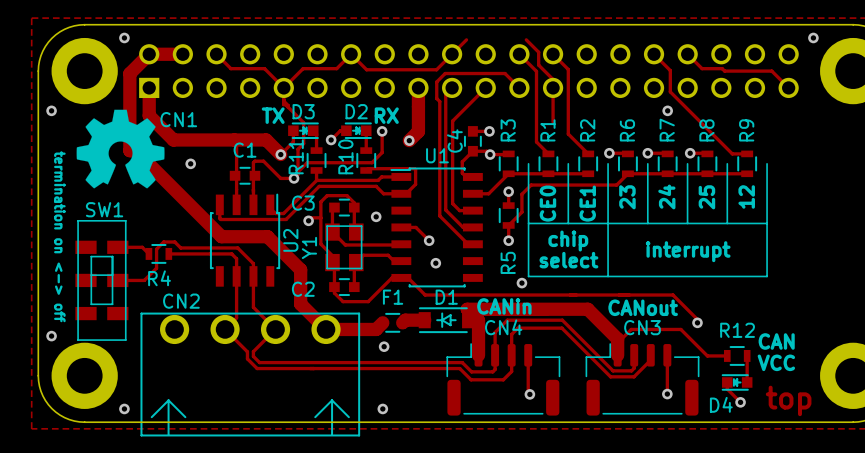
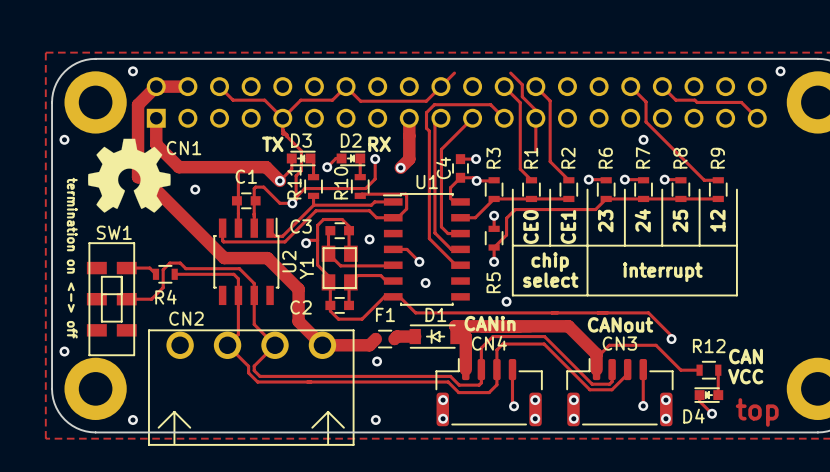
via: none -> (443, 400)
via: none -> (535, 400)
via: none -> (573, 400)
via: none -> (665, 400)
via: none -> (443, 418)
via: none -> (535, 418)
via: none -> (573, 418)
via: none -> (665, 418)

